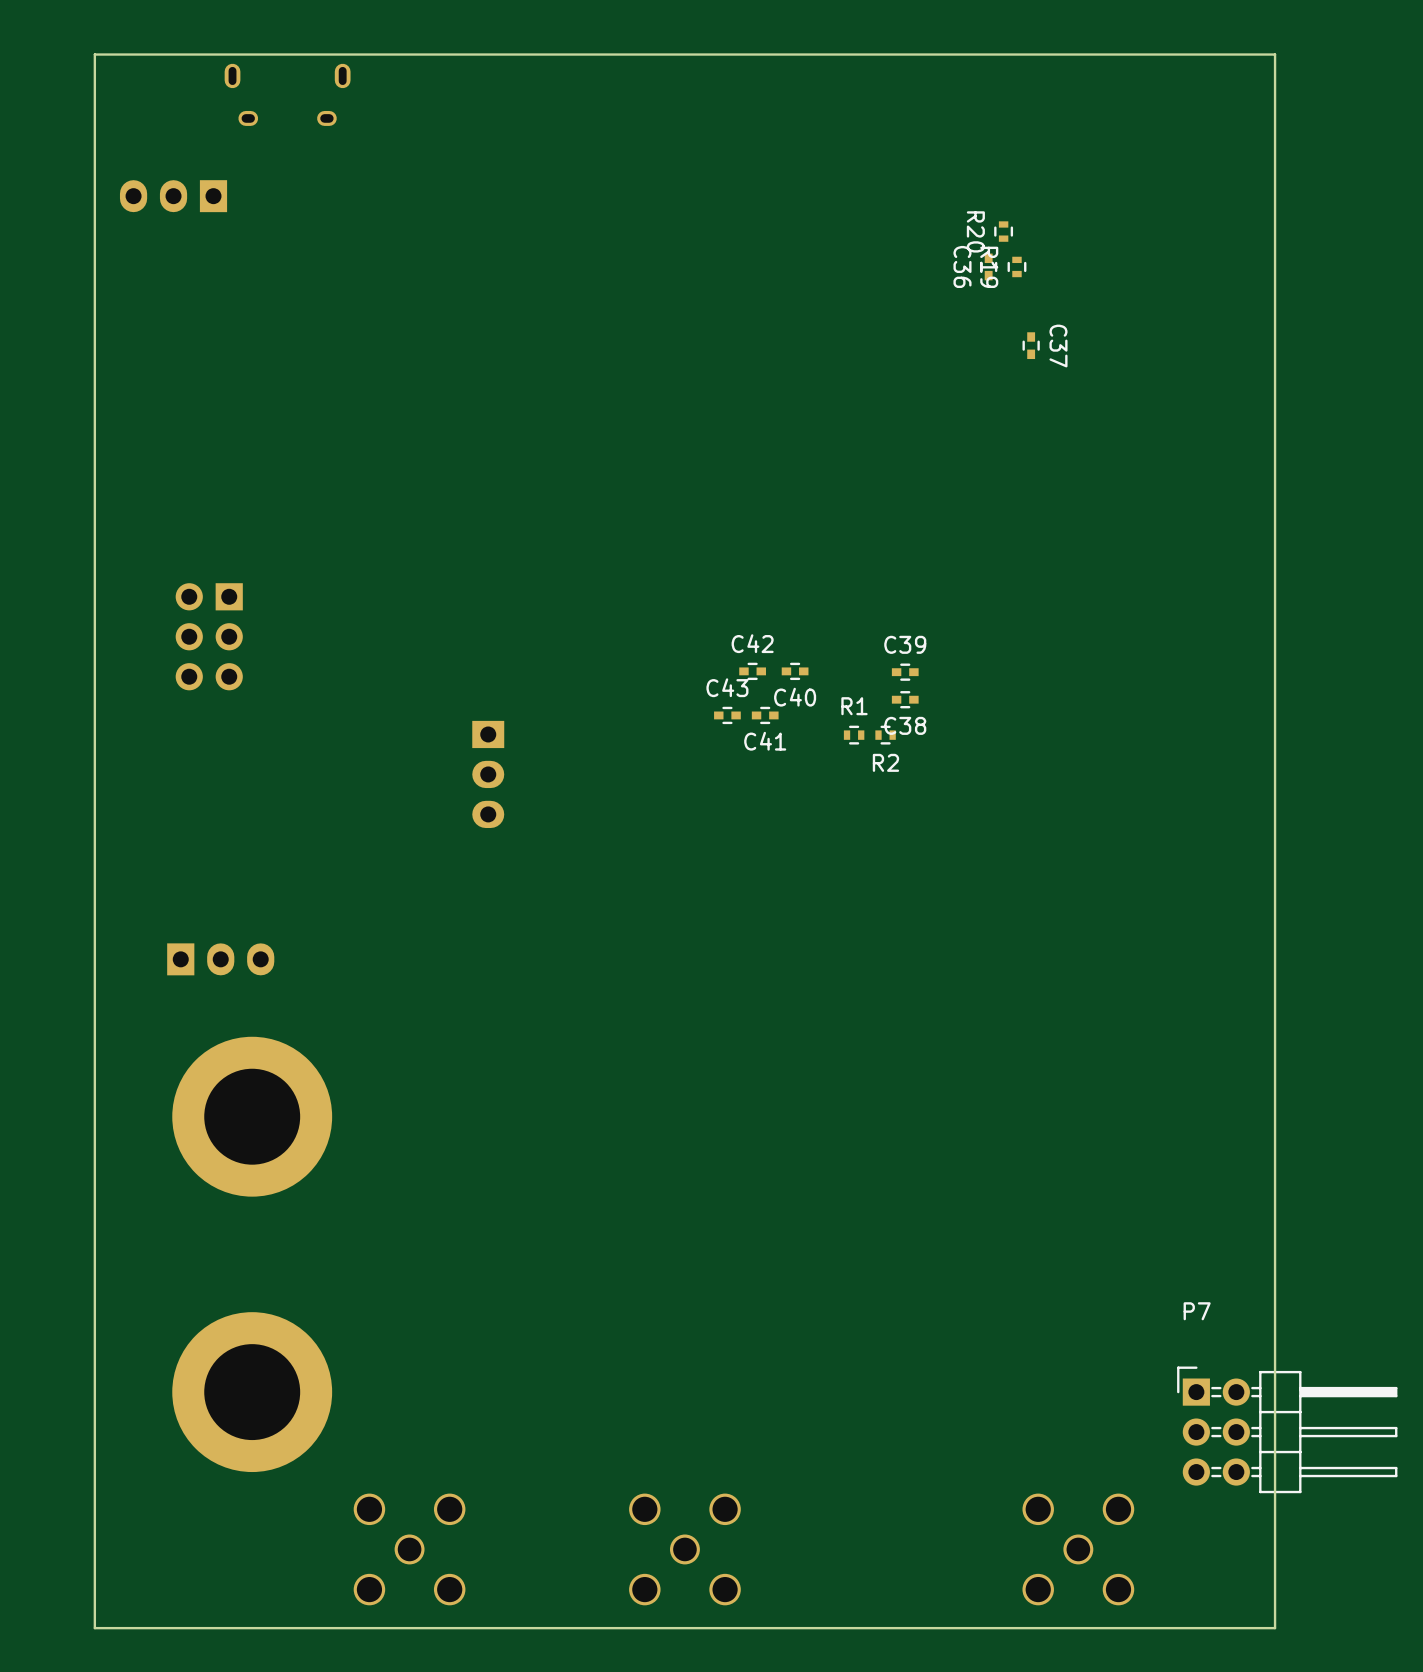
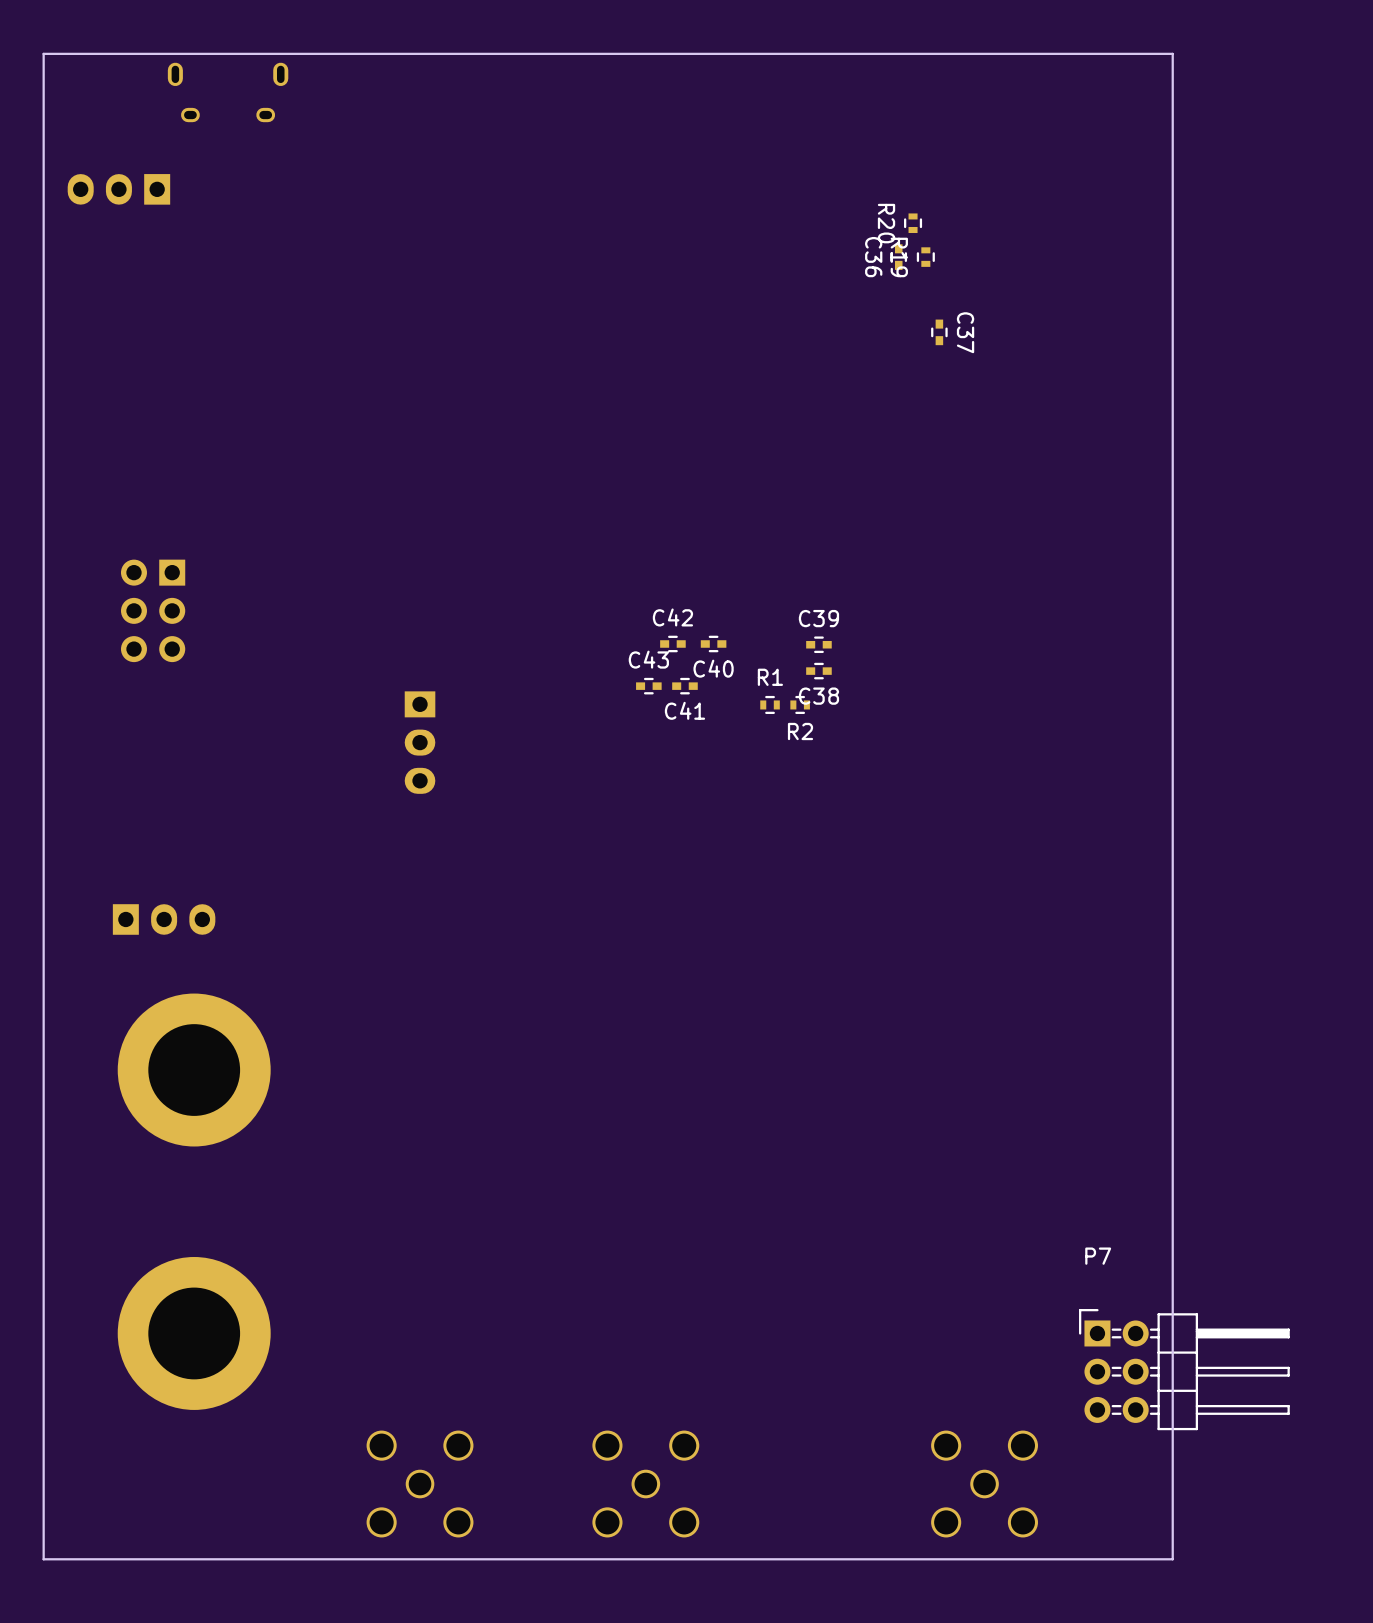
part position: (409, 1549) -> (420, 1484)
part position: (684, 1549) -> (645, 1484)

